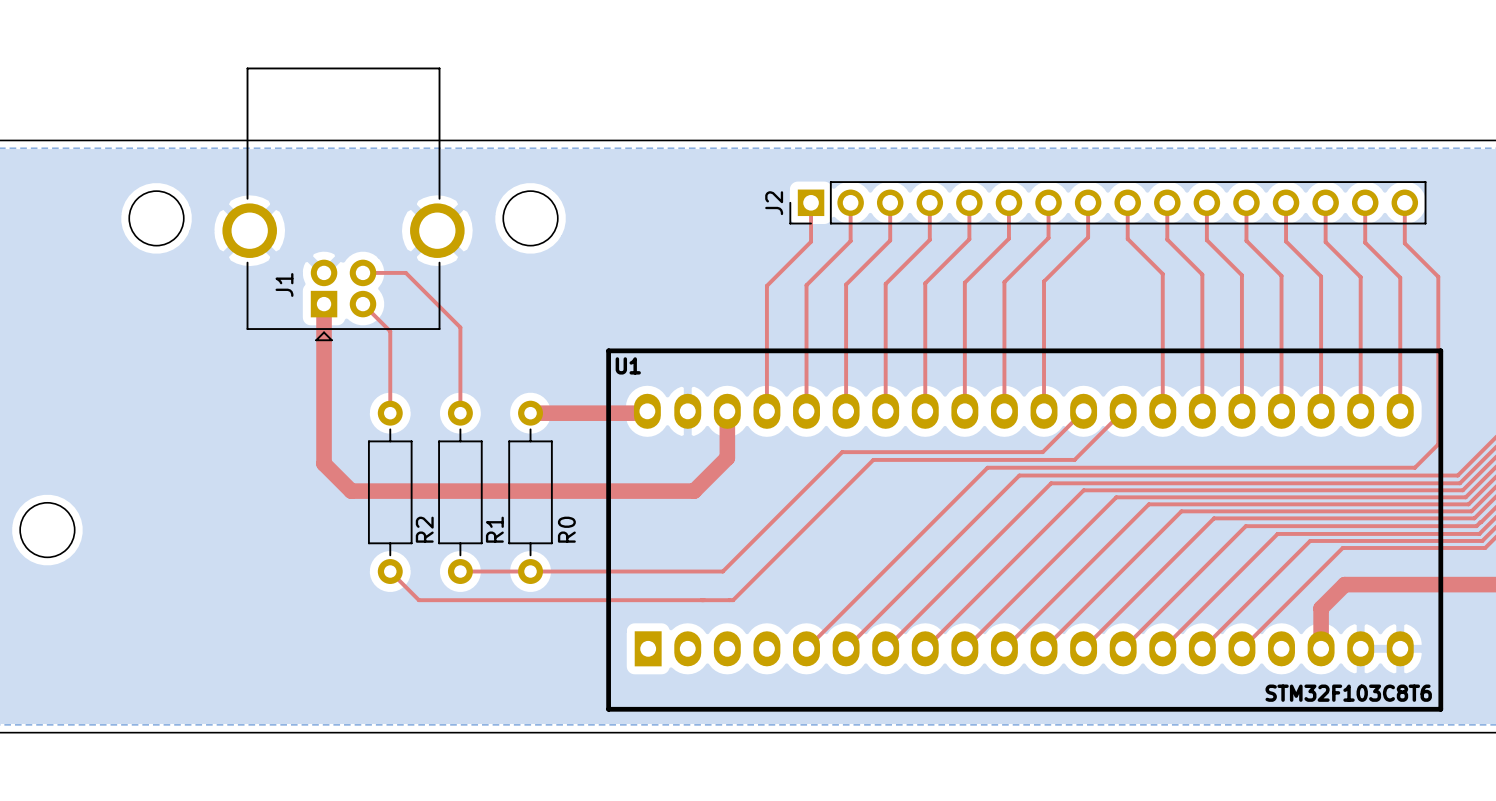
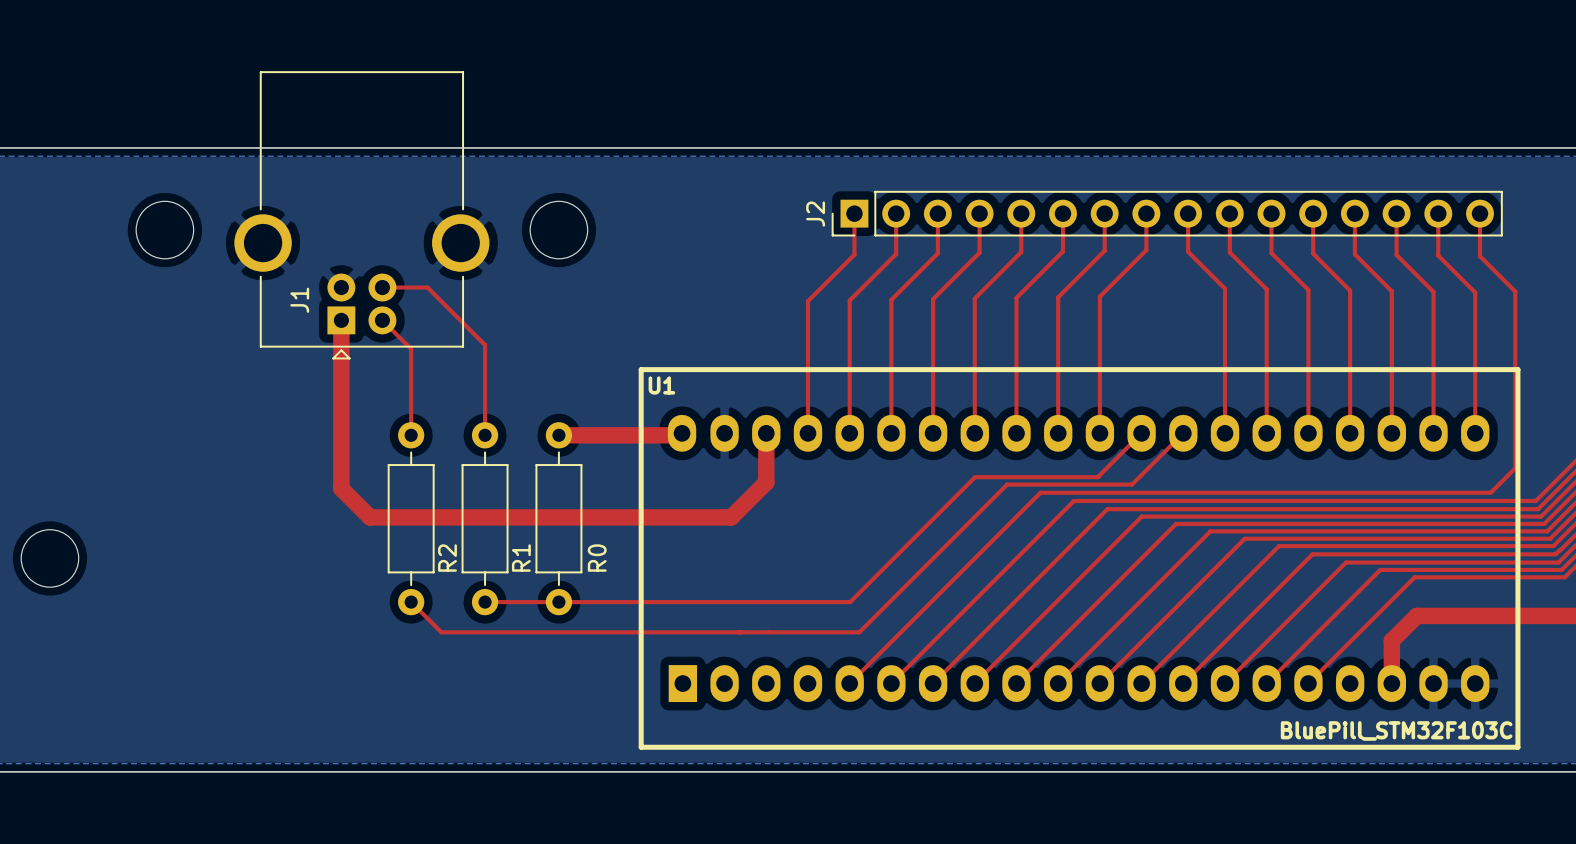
top track: (1042, 452) (842, 452) (722, 571) -> (1098, 476) (975, 477) (850, 602) (761, 602)
top track: (955, 459) (873, 459) (733, 600) -> (1007, 484) (859, 632) (772, 632)
U1 value: STM32F103C8T6 (1348, 693) -> BluePill_STM32F103C (1396, 730)

